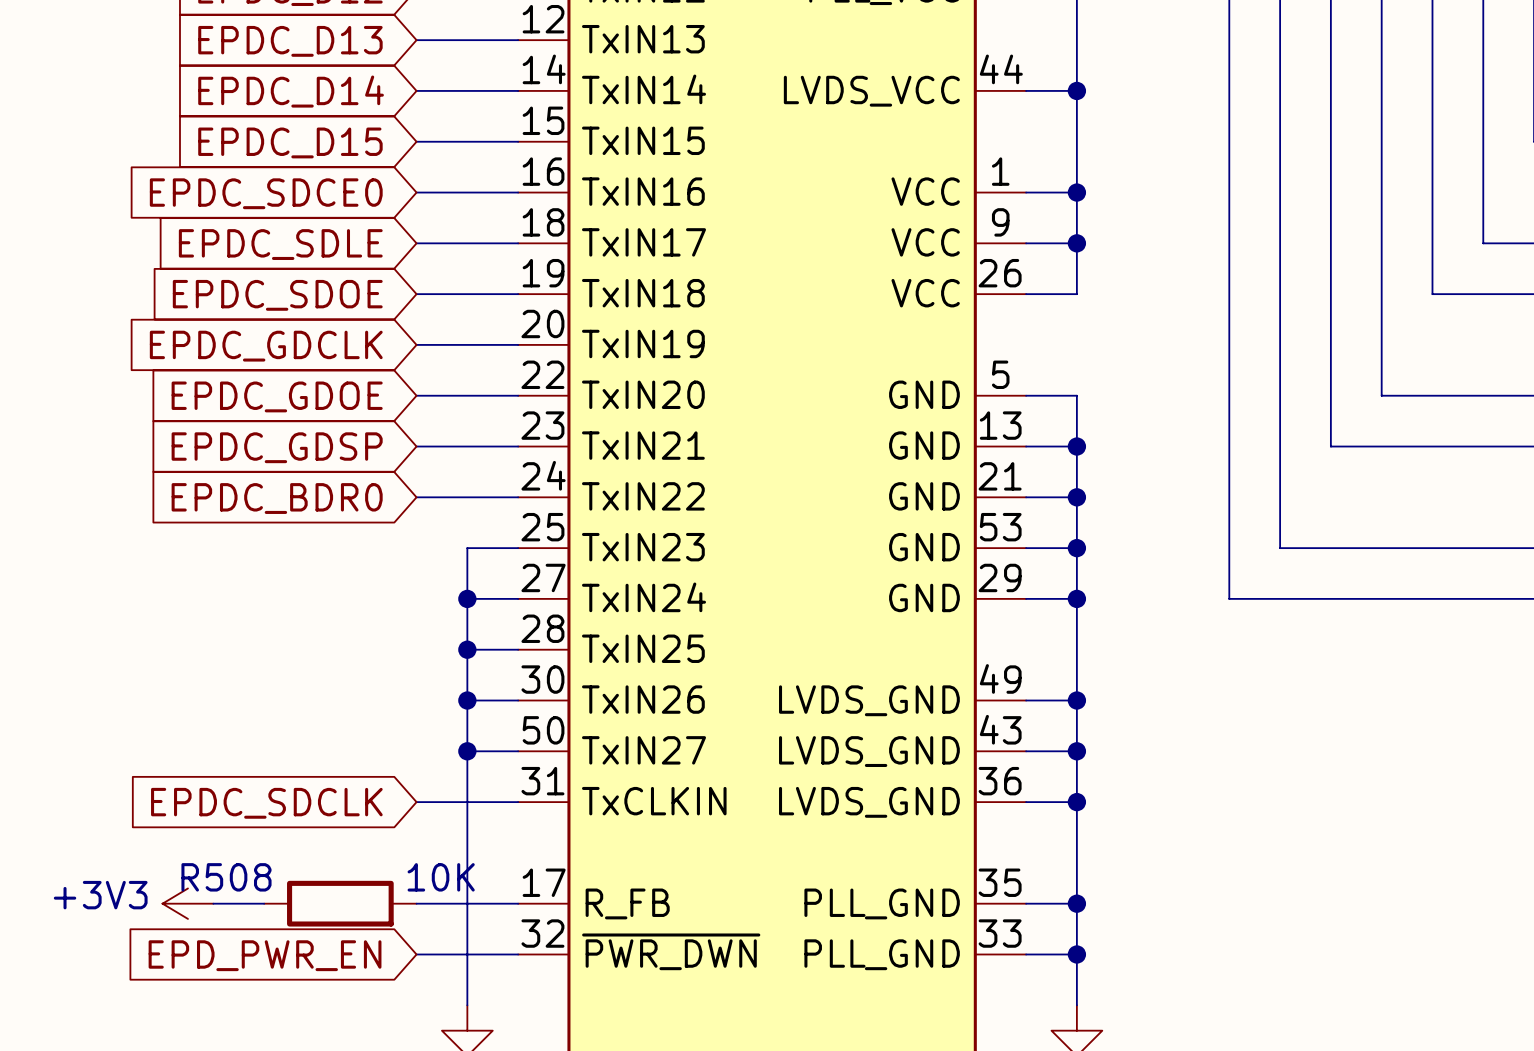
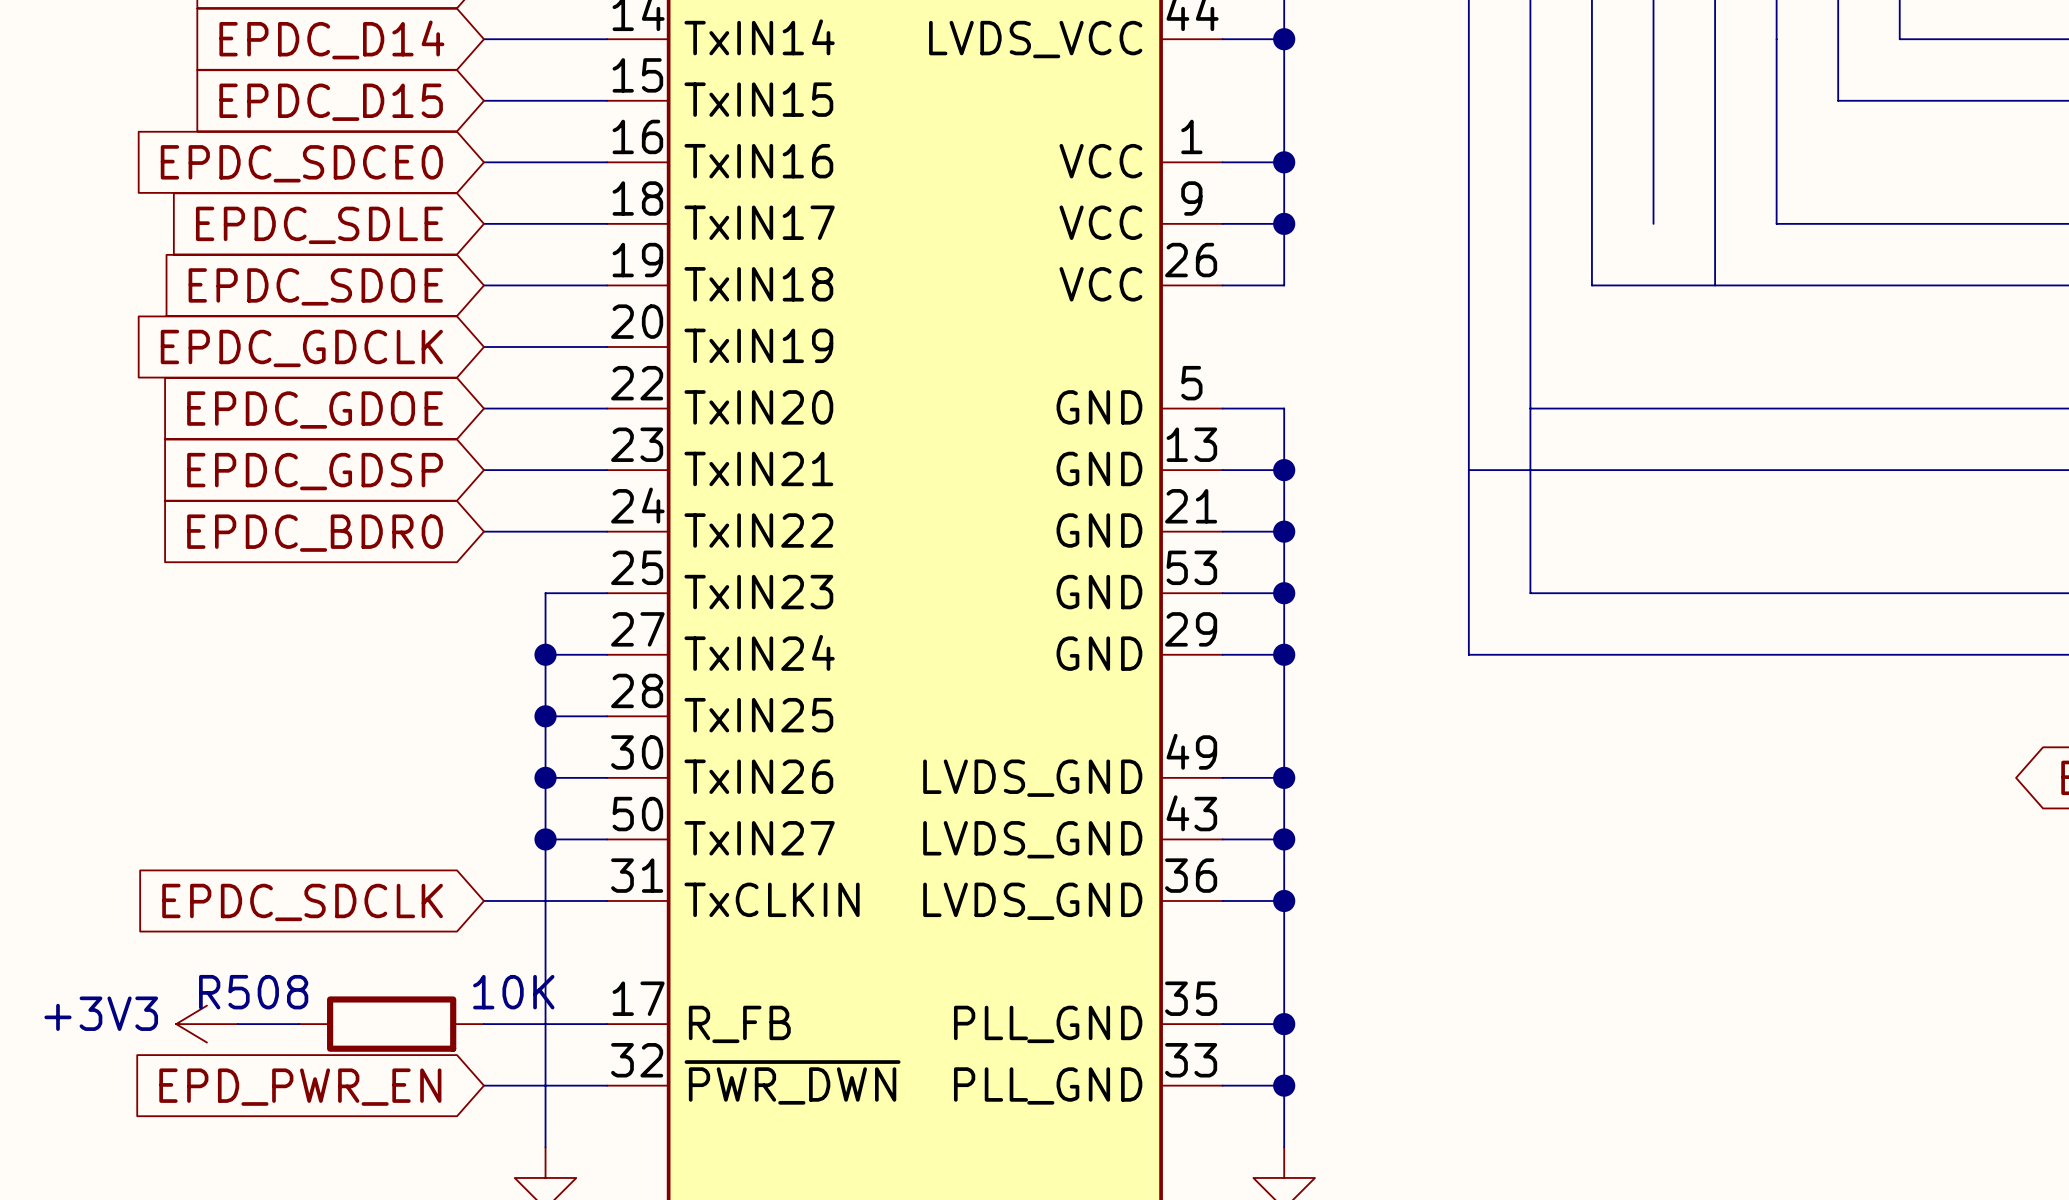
wire: (1381, 243) (1381, 395) -> (1530, 408) (1653, 408)
wire: (1330, 294) (1330, 446) -> (1468, 470) (1591, 470)
wire: none -> (1591, 285) (1715, 285)

